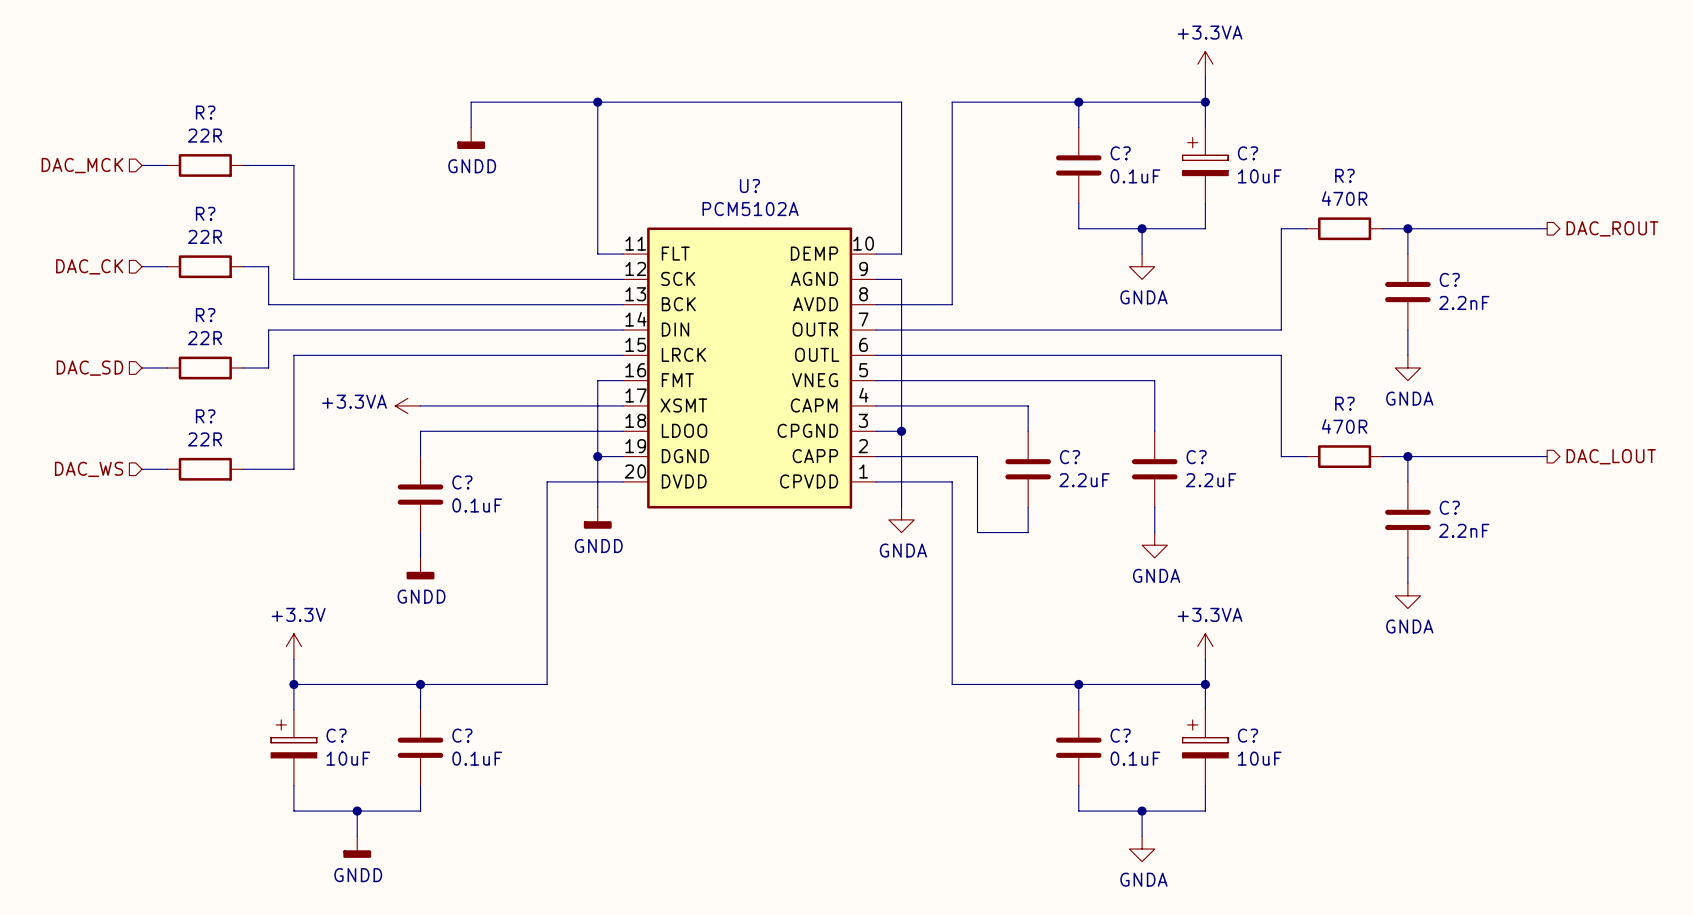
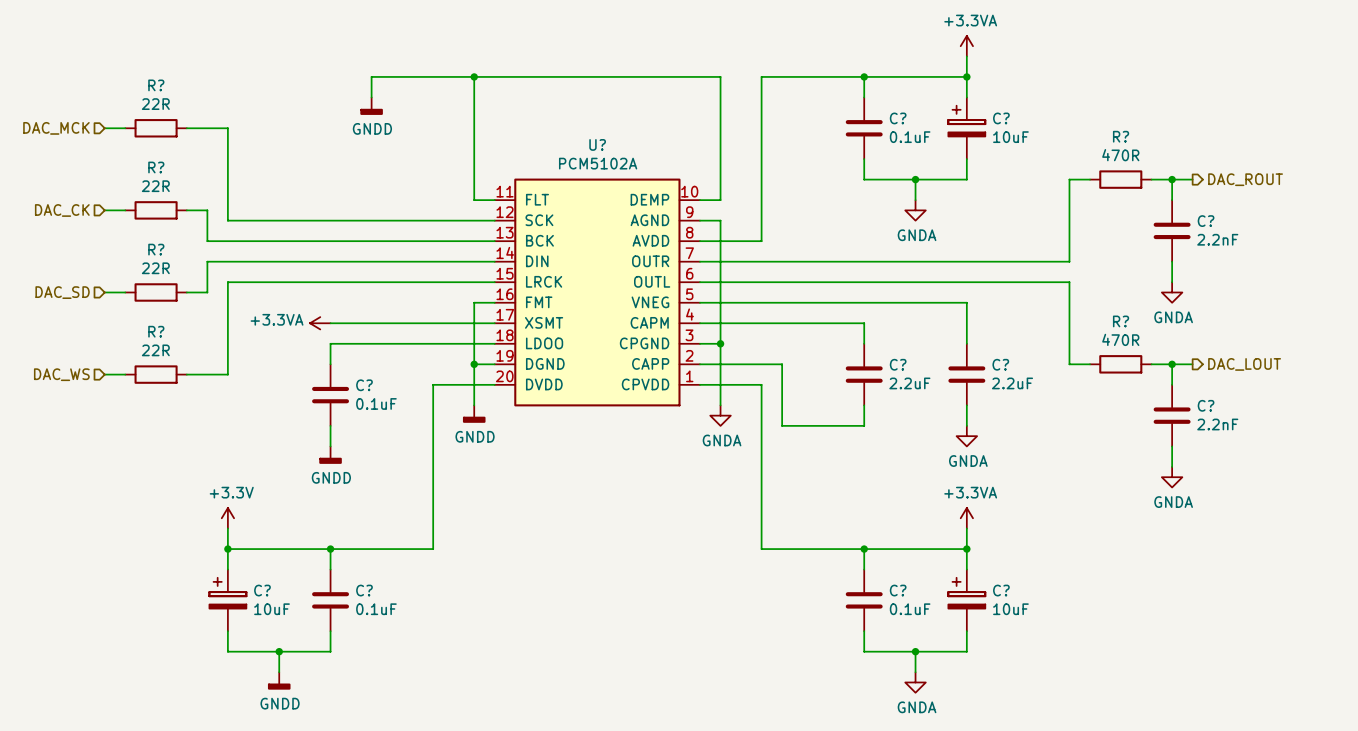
wire: (1306, 228) (1281, 228) (1281, 330) -> (1090, 179) (1069, 179) (1069, 261) (1028, 261)
R? position: (1344, 228) -> (1120, 179)
wire: (1382, 228) (1433, 228) -> none
wire: (1407, 228) (1407, 254) -> (1172, 179) (1172, 200)
junction position: (1407, 228) -> (1172, 179)
wire: (1483, 228) (1547, 228) -> none
hierarchical label position: DAC_ROUT (1612, 228) -> DAC_ROUT (1245, 179)
C? position: (1407, 292) -> (1172, 230)
wire: (1407, 330) (1407, 355) -> (1172, 261) (1172, 282)
wire: (1281, 355) (1281, 456) (1306, 456) -> (1028, 282) (1069, 282) (1069, 364) (1090, 364)
power symbol position: GNDA (1407, 367) -> GNDA (1172, 292)
wire: (1154, 380) (1154, 431) -> (925, 302) (966, 302) (966, 343)
wire: (1028, 405) (1028, 431) -> (823, 323) (864, 323) (864, 343)
R? position: (1344, 456) -> (1120, 364)
wire: (1382, 456) (1433, 456) -> none
wire: (1407, 456) (1407, 481) -> (1172, 364) (1172, 384)
junction position: (1407, 456) -> (1172, 364)
wire: (1483, 456) (1547, 456) -> none
hierarchical label position: DAC_LOUT (1611, 456) -> DAC_LOUT (1244, 364)
C?: 2.2uF (1028, 469) -> none
C?: none -> 2.2uF (864, 374)
C?: 2.2uF (1154, 469) -> none
C?: none -> 2.2uF (966, 374)
wire: (1028, 507) (1028, 532) -> (864, 405) (864, 425) (823, 425)
wire: (1154, 507) (1154, 532) -> (966, 405) (966, 425)
C? position: (1407, 519) -> (1172, 415)
power symbol position: GNDA (1154, 545) -> GNDA (966, 436)
wire: (1407, 557) (1407, 583) -> (1172, 446) (1172, 466)
power symbol position: GNDA (1407, 595) -> GNDA (1172, 477)

